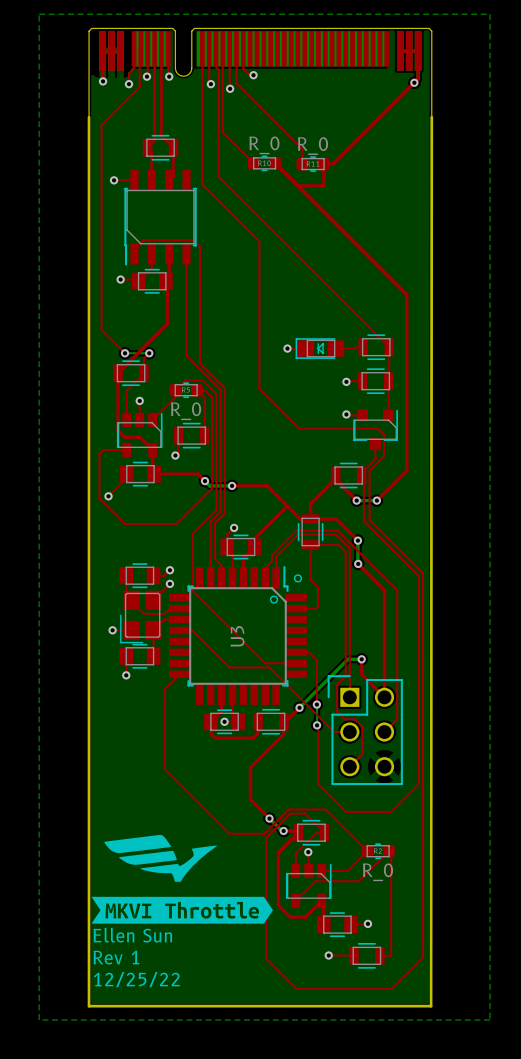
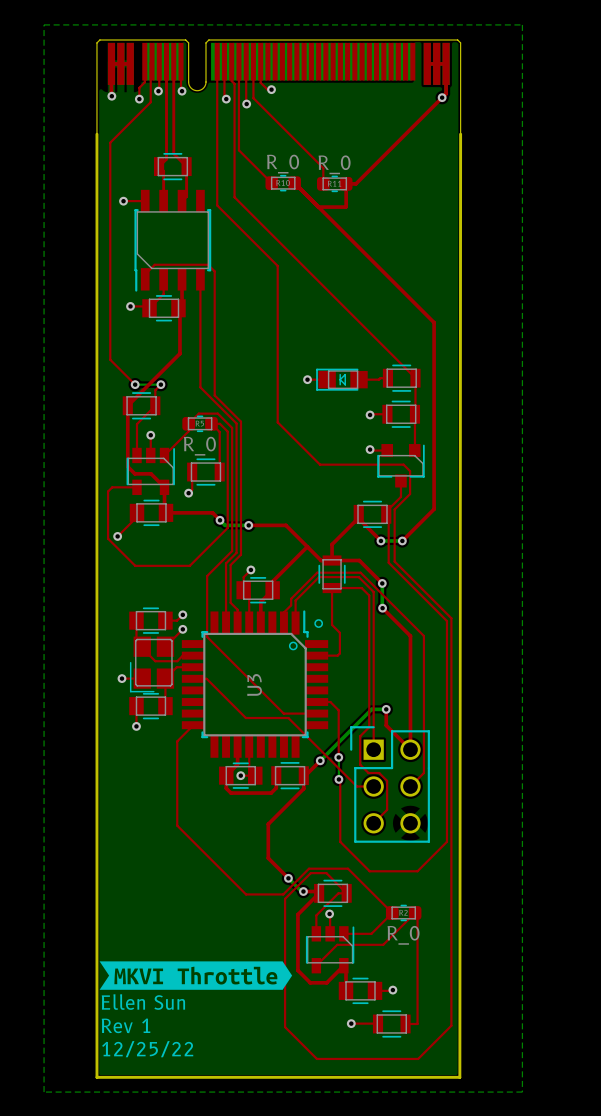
drawing: [104, 834, 217, 882] -> none

